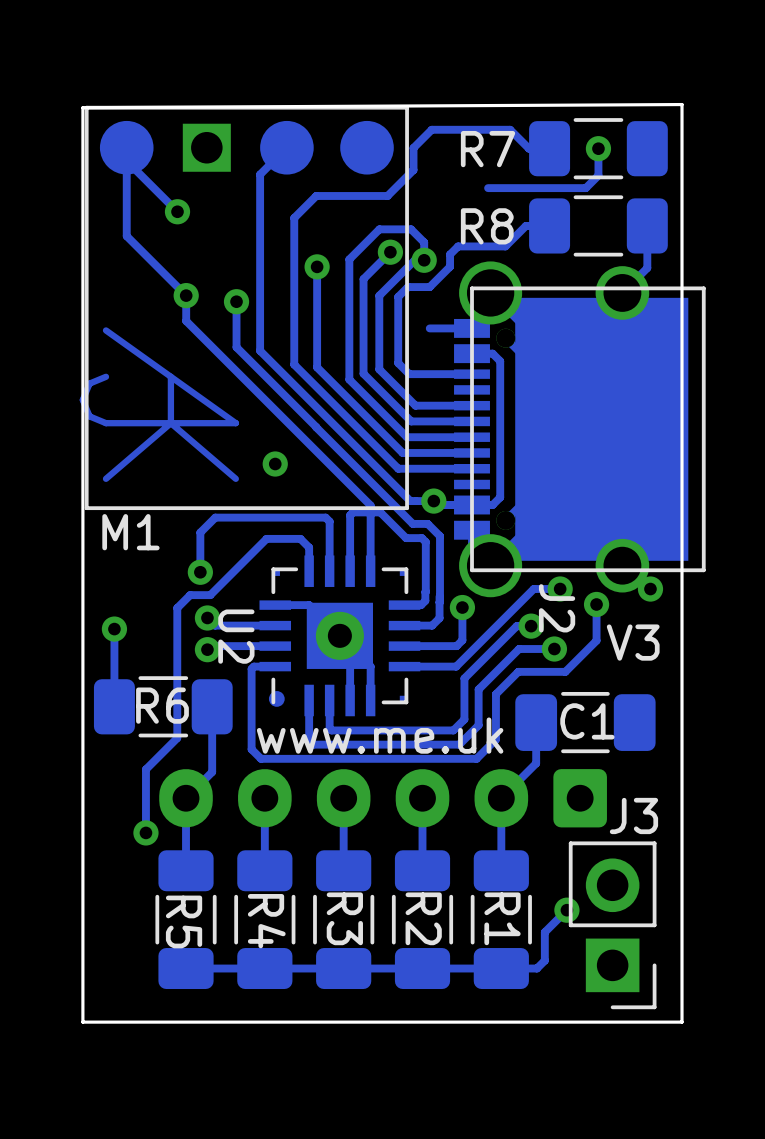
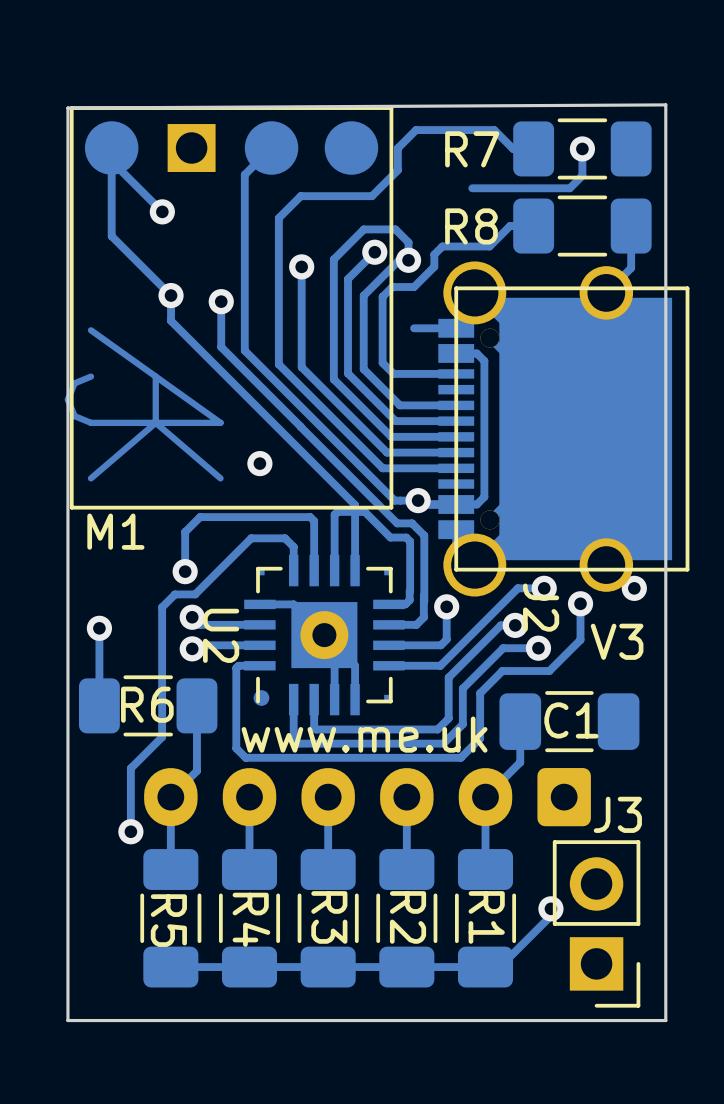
track: (566, 910) (544, 932) (544, 960) (536, 968) (515, 968) -> (554, 912) (499, 967)

